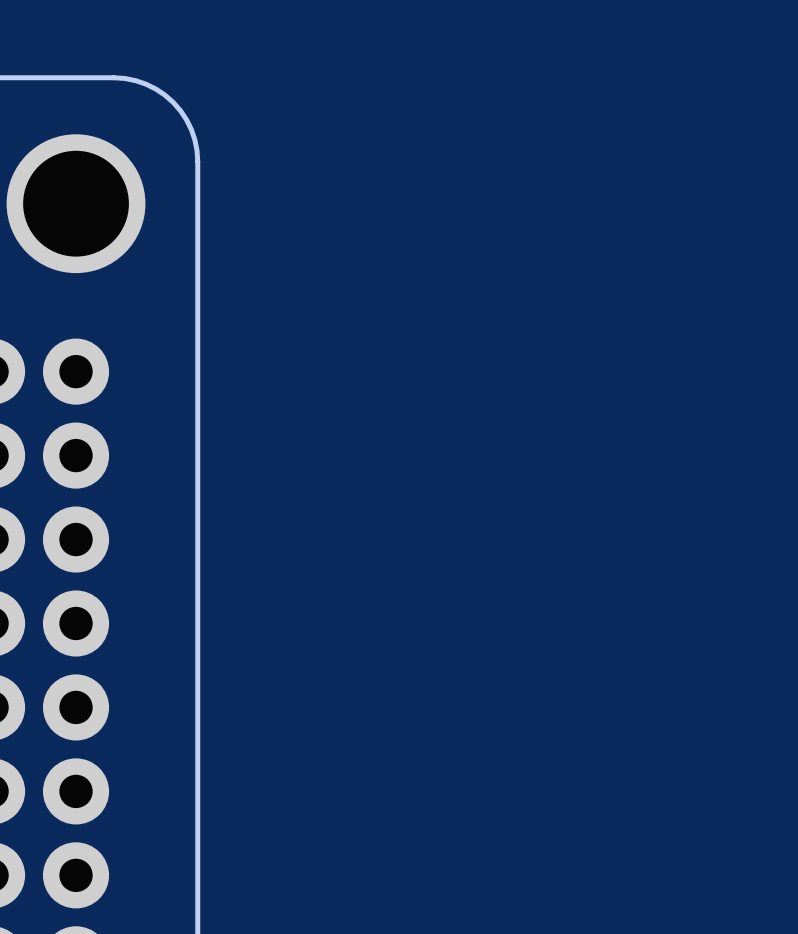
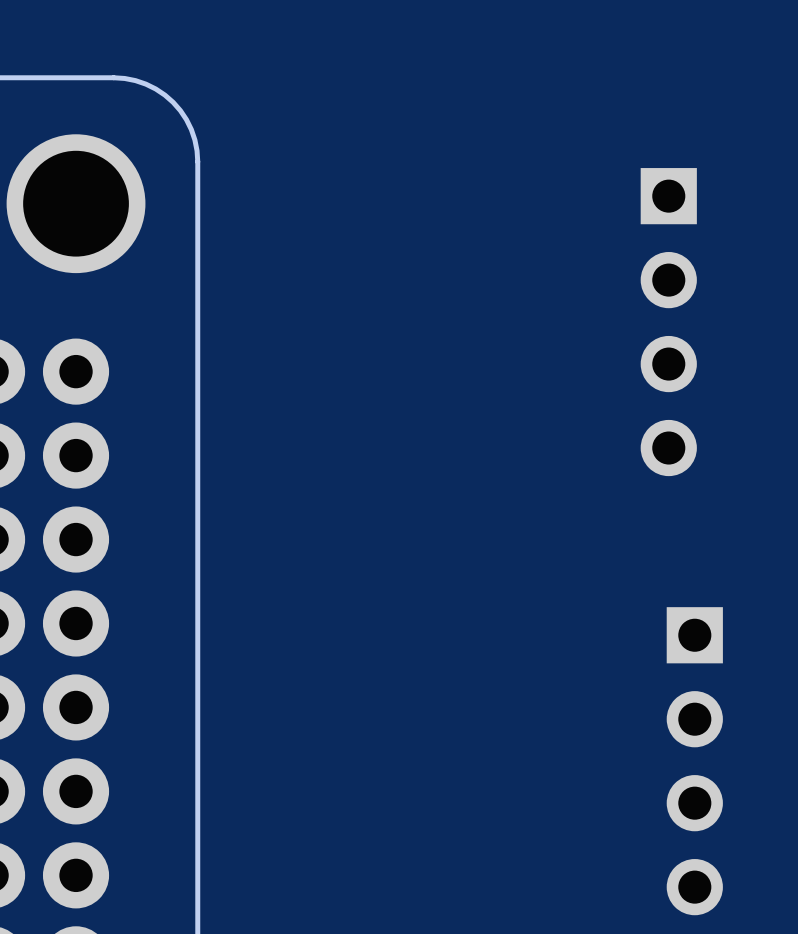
part: none -> (668, 322)
part: none -> (694, 761)

